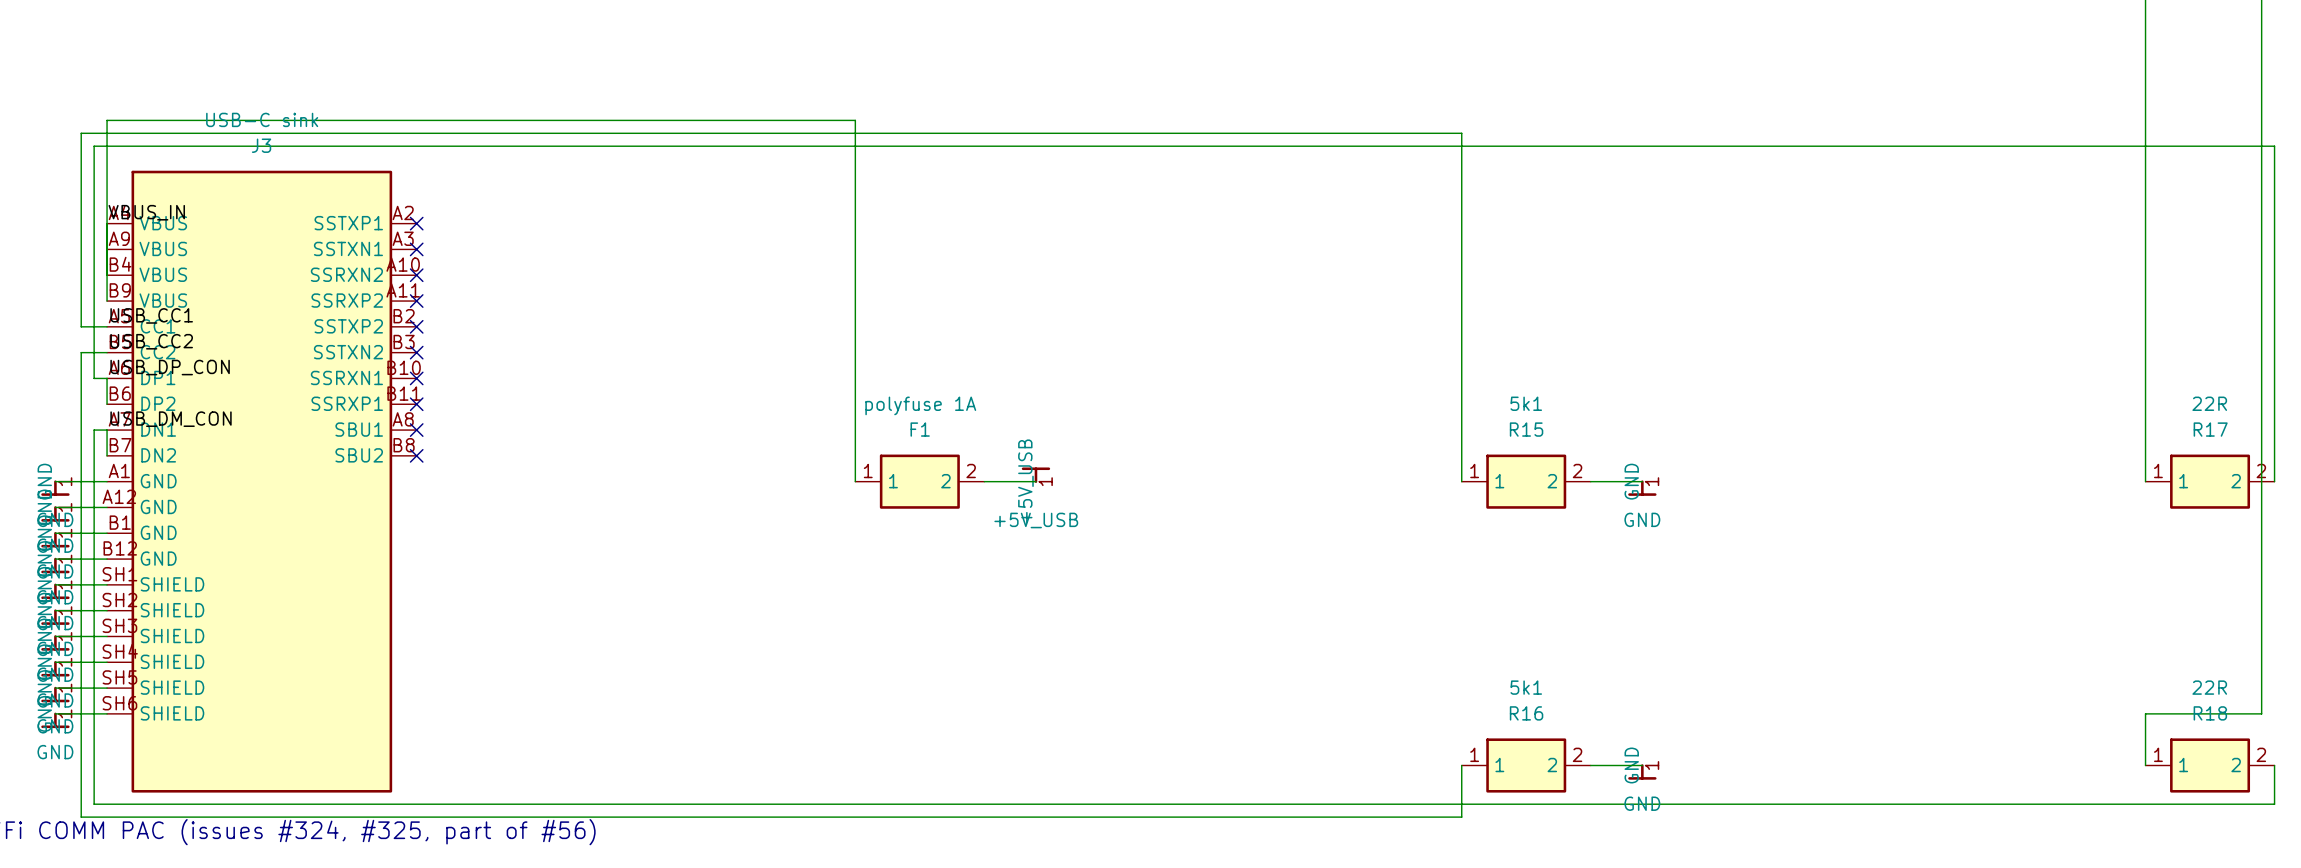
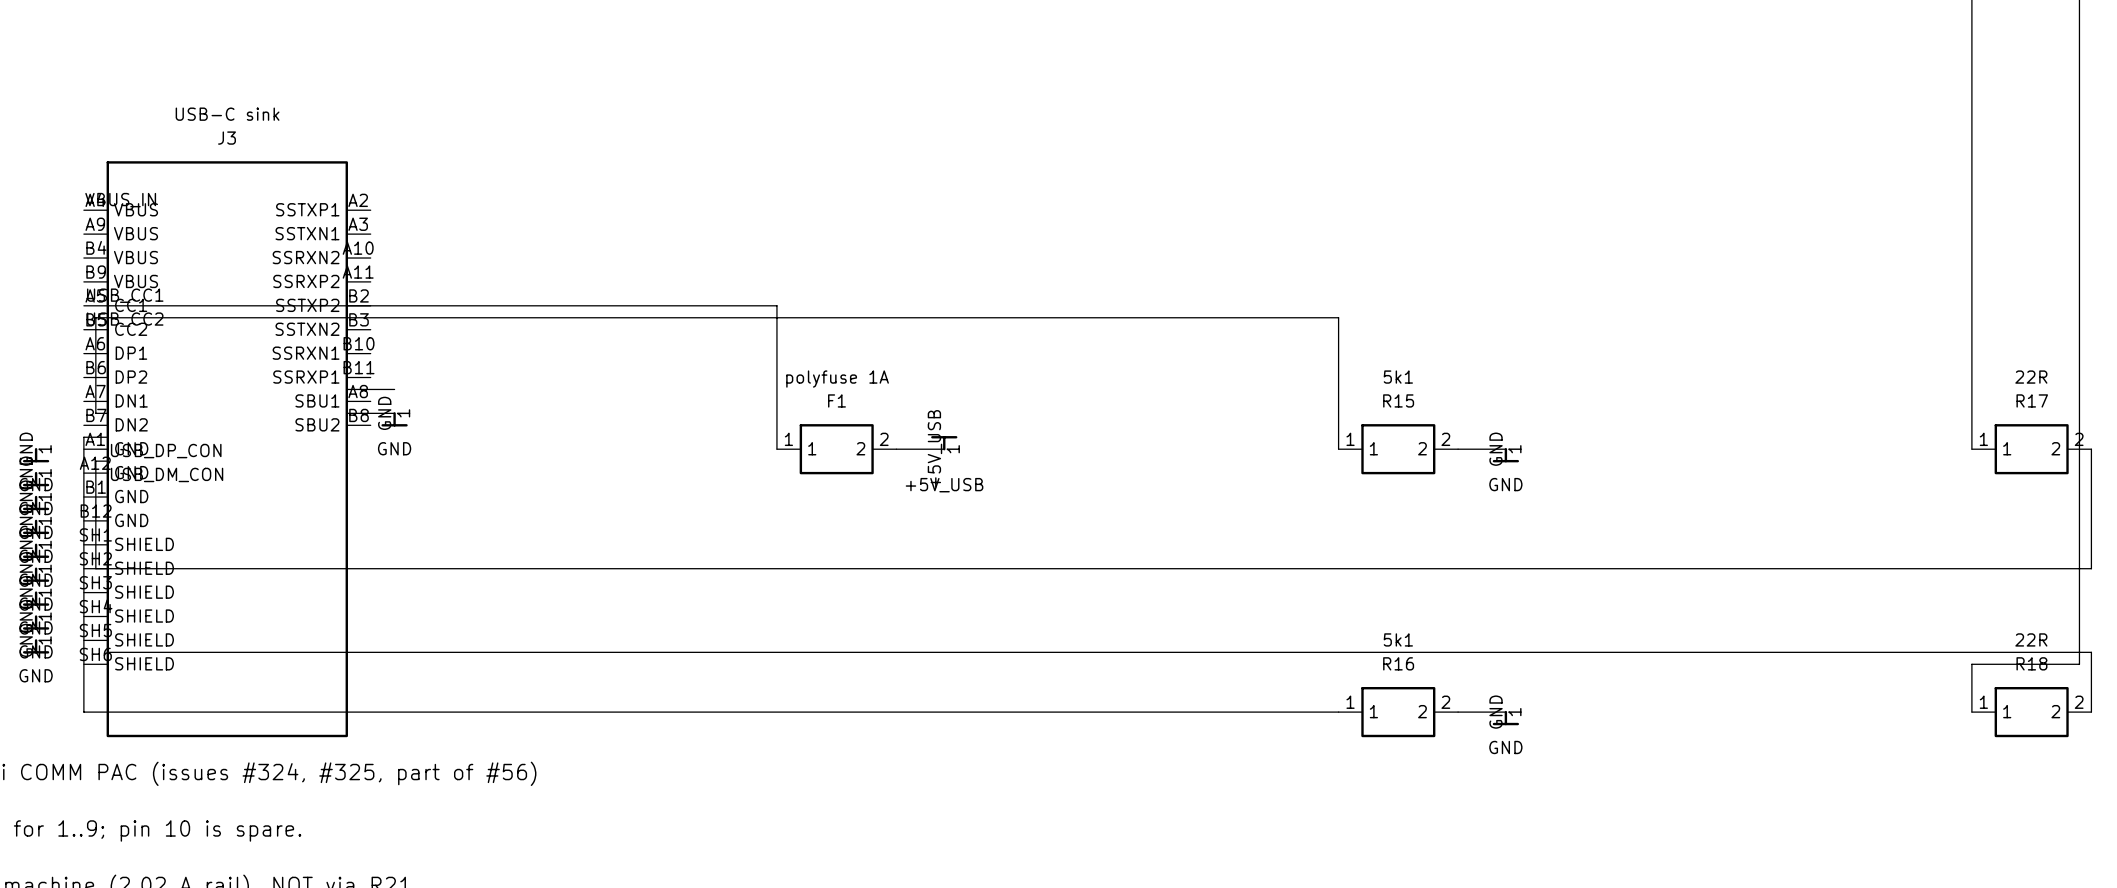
no-connect mark: (416, 223) -> none
no-connect mark: (416, 249) -> none
no-connect mark: (416, 275) -> none
wire: (107, 301) (107, 120) (855, 120) (855, 326) -> (107, 389) (107, 305) (776, 305)
no-connect mark: (416, 301) -> none
wire: (107, 326) (81, 326) (81, 133) (1461, 133) (1461, 339) -> (107, 413) (95, 413) (95, 317) (1338, 317)
no-connect mark: (416, 326) -> none
wire: (107, 352) (81, 352) (81, 817) (1461, 817) (1461, 765) -> (107, 437) (83, 437) (83, 712) (1338, 712)
no-connect mark: (416, 352) -> none
label position: USB_DP_CON (170, 367) -> USB_DP_CON (166, 451)
no-connect mark: (416, 378) -> none
wire: (107, 404) (107, 378) (94, 378) (94, 146) (2274, 146) (2274, 481) -> (107, 461) (95, 461) (95, 568) (2091, 568) (2091, 449)
no-connect mark: (416, 404) -> none
wire: none -> (346, 389) (394, 389)
label position: USB_DM_CON (171, 419) -> USB_DM_CON (167, 474)
no-connect mark: (416, 430) -> none
wire: none -> (346, 413) (394, 413)
power symbol: none -> GND (394, 419)
wire: (107, 455) (107, 430) (94, 430) (94, 804) (2274, 804) (2274, 765) -> (107, 485) (107, 652) (2091, 652) (2091, 712)
no-connect mark: (416, 455) -> none
wire: (55, 481) (107, 481) -> none
wire: (55, 507) (107, 507) -> none
wire: (55, 533) (107, 533) -> none
wire: (55, 559) (107, 559) -> none
wire: (55, 584) (107, 584) -> none
wire: (55, 610) (107, 610) -> none
wire: (55, 636) (107, 636) -> none
wire: (55, 662) (107, 662) -> none
wire: (55, 688) (107, 688) -> none
wire: (55, 713) (107, 713) -> none
power symbol: GND (55, 720) -> none

